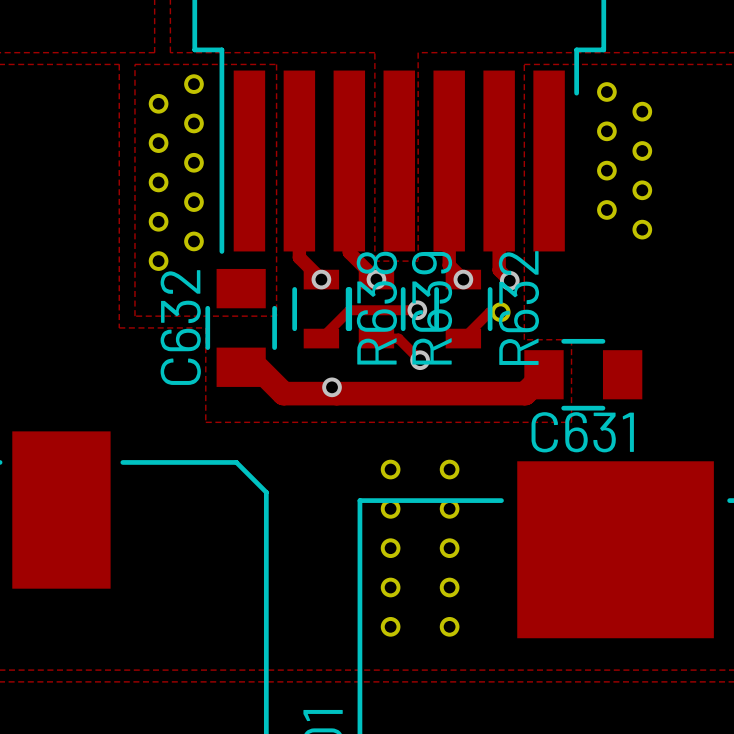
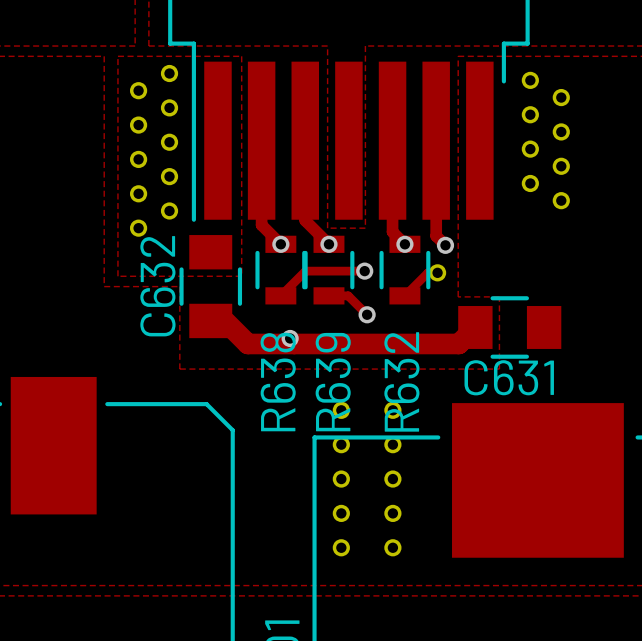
R638 name position: R638 (376, 308) -> R638 (278, 382)
R639 name position: R639 (432, 308) -> R639 (333, 382)
R632 name position: R632 (518, 308) -> R632 (401, 381)

